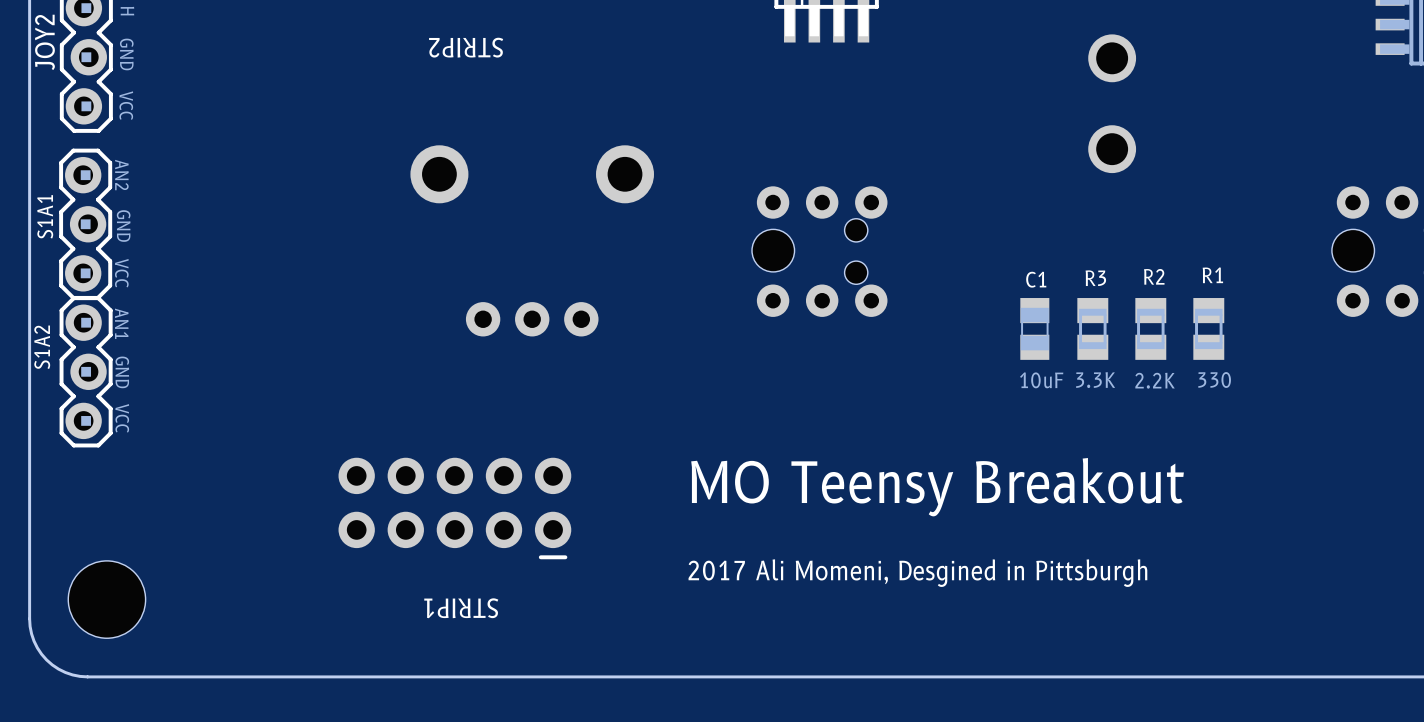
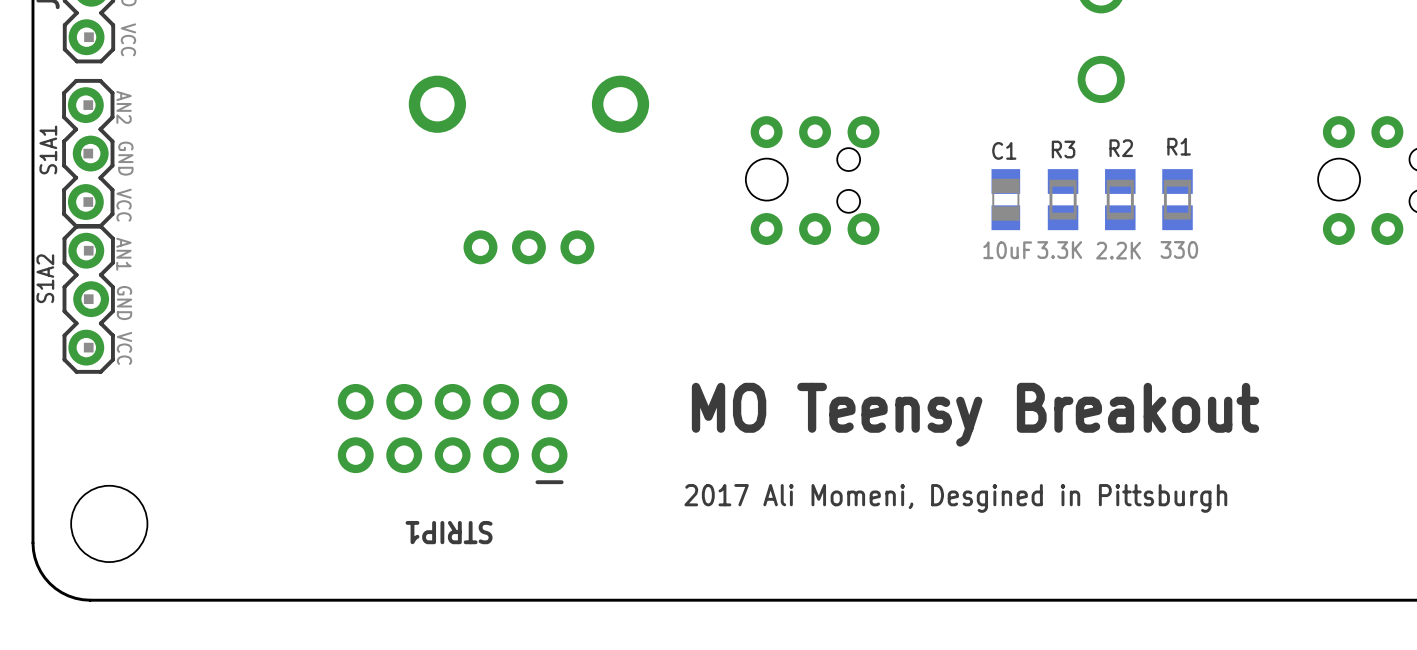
C1 position: (1034, 328) -> (1005, 199)
R3 position: (1092, 328) -> (1063, 199)
R2 position: (1150, 328) -> (1120, 199)
R1 position: (1208, 328) -> (1177, 199)

